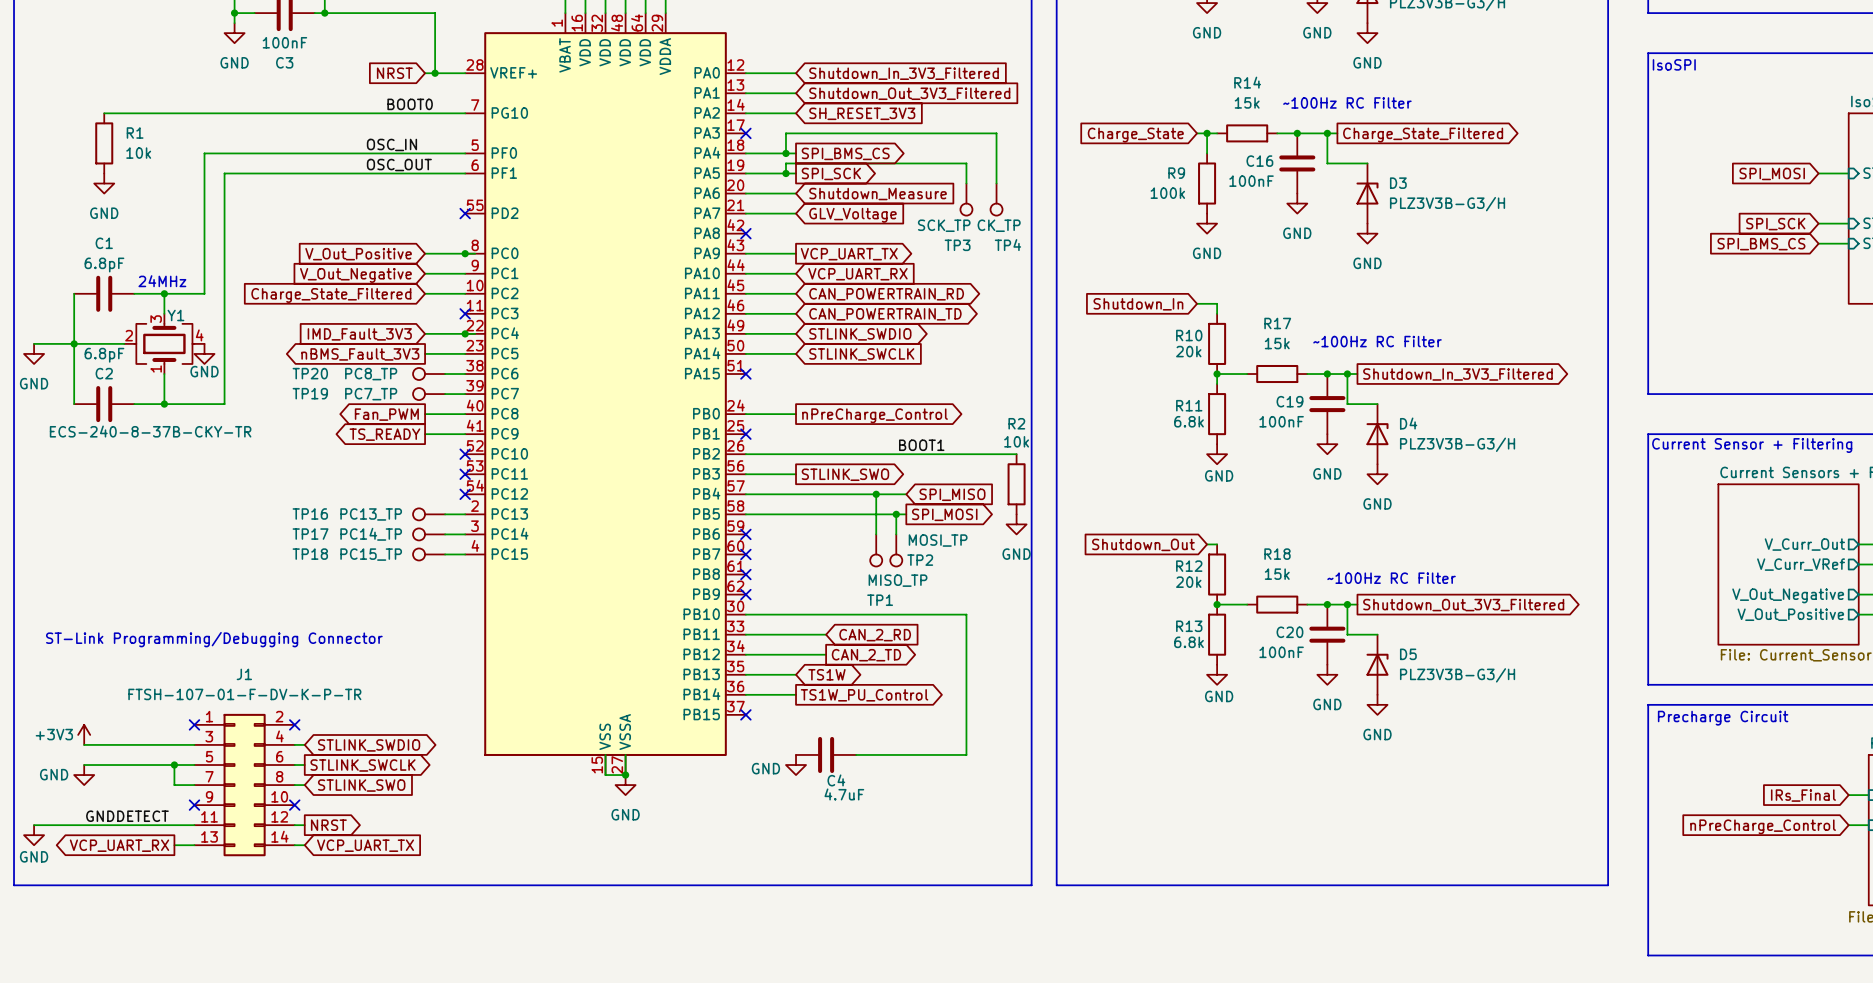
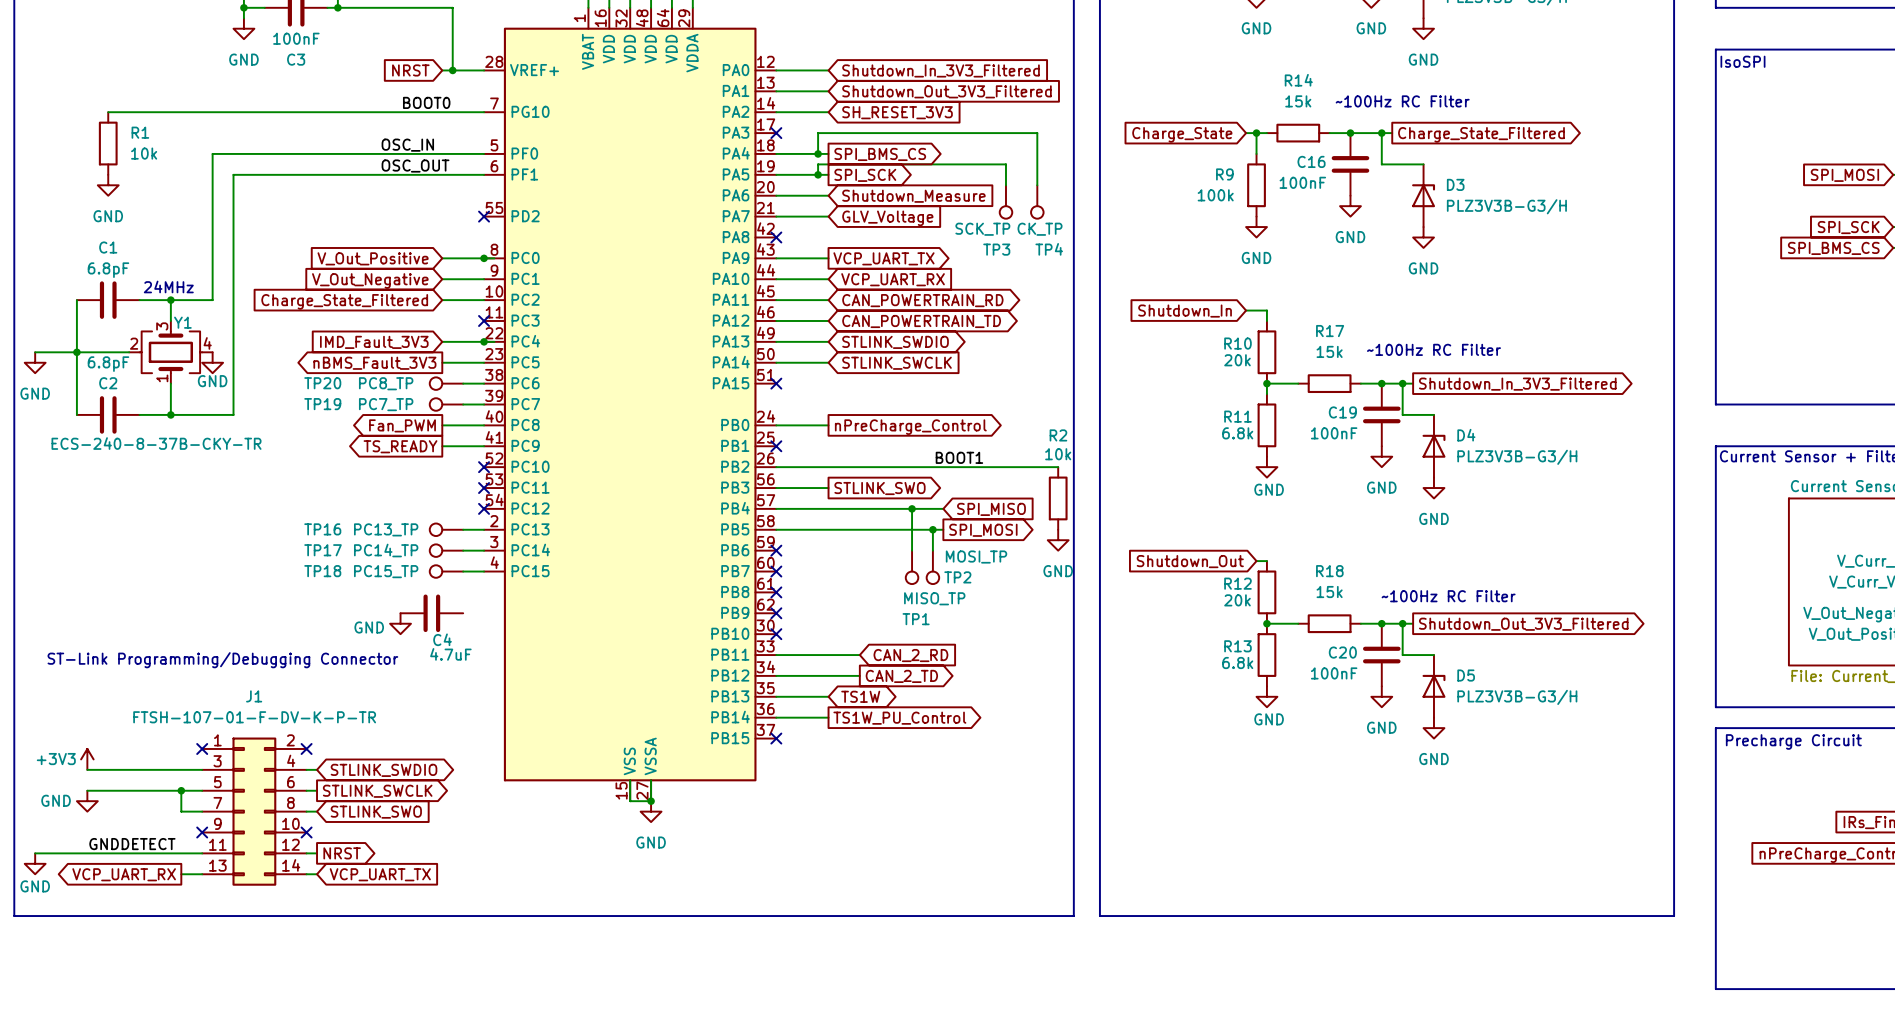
power symbol: none -> GND (400, 623)
wire: (745, 614) (966, 614) (966, 754) (856, 754) -> none
no-connect mark: none -> (776, 634)
C4 position: (826, 754) -> (431, 613)
power symbol: GND (796, 765) -> none

